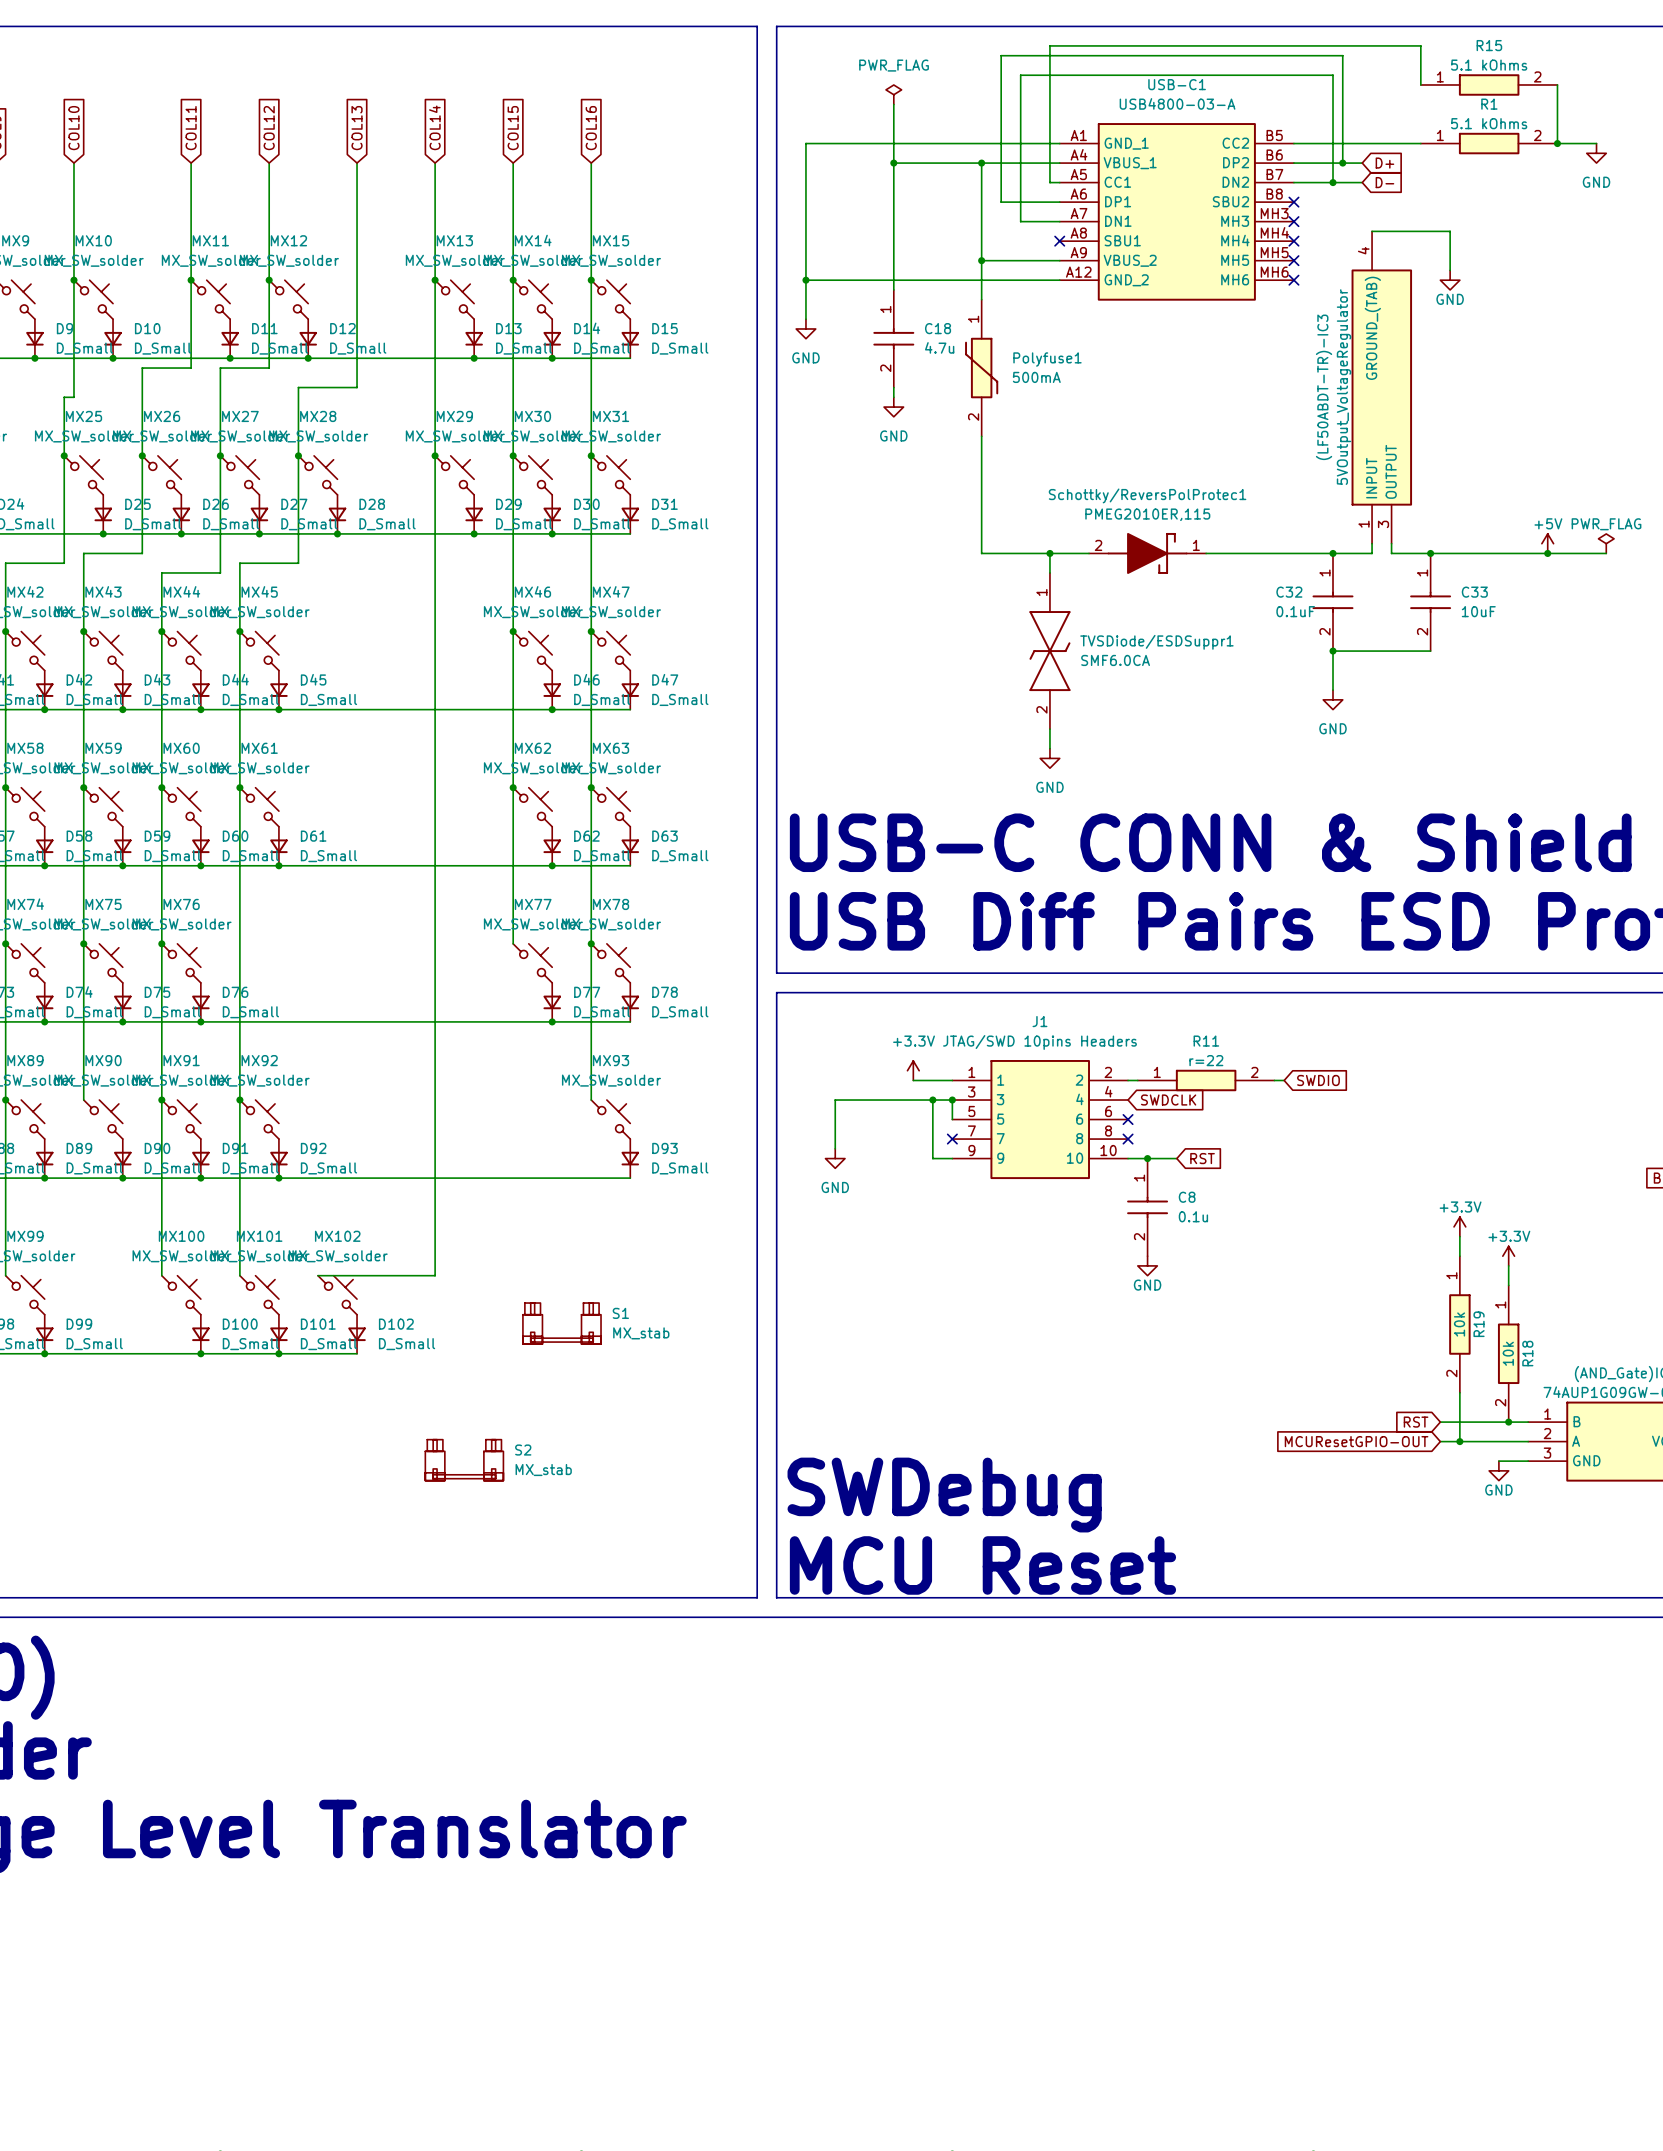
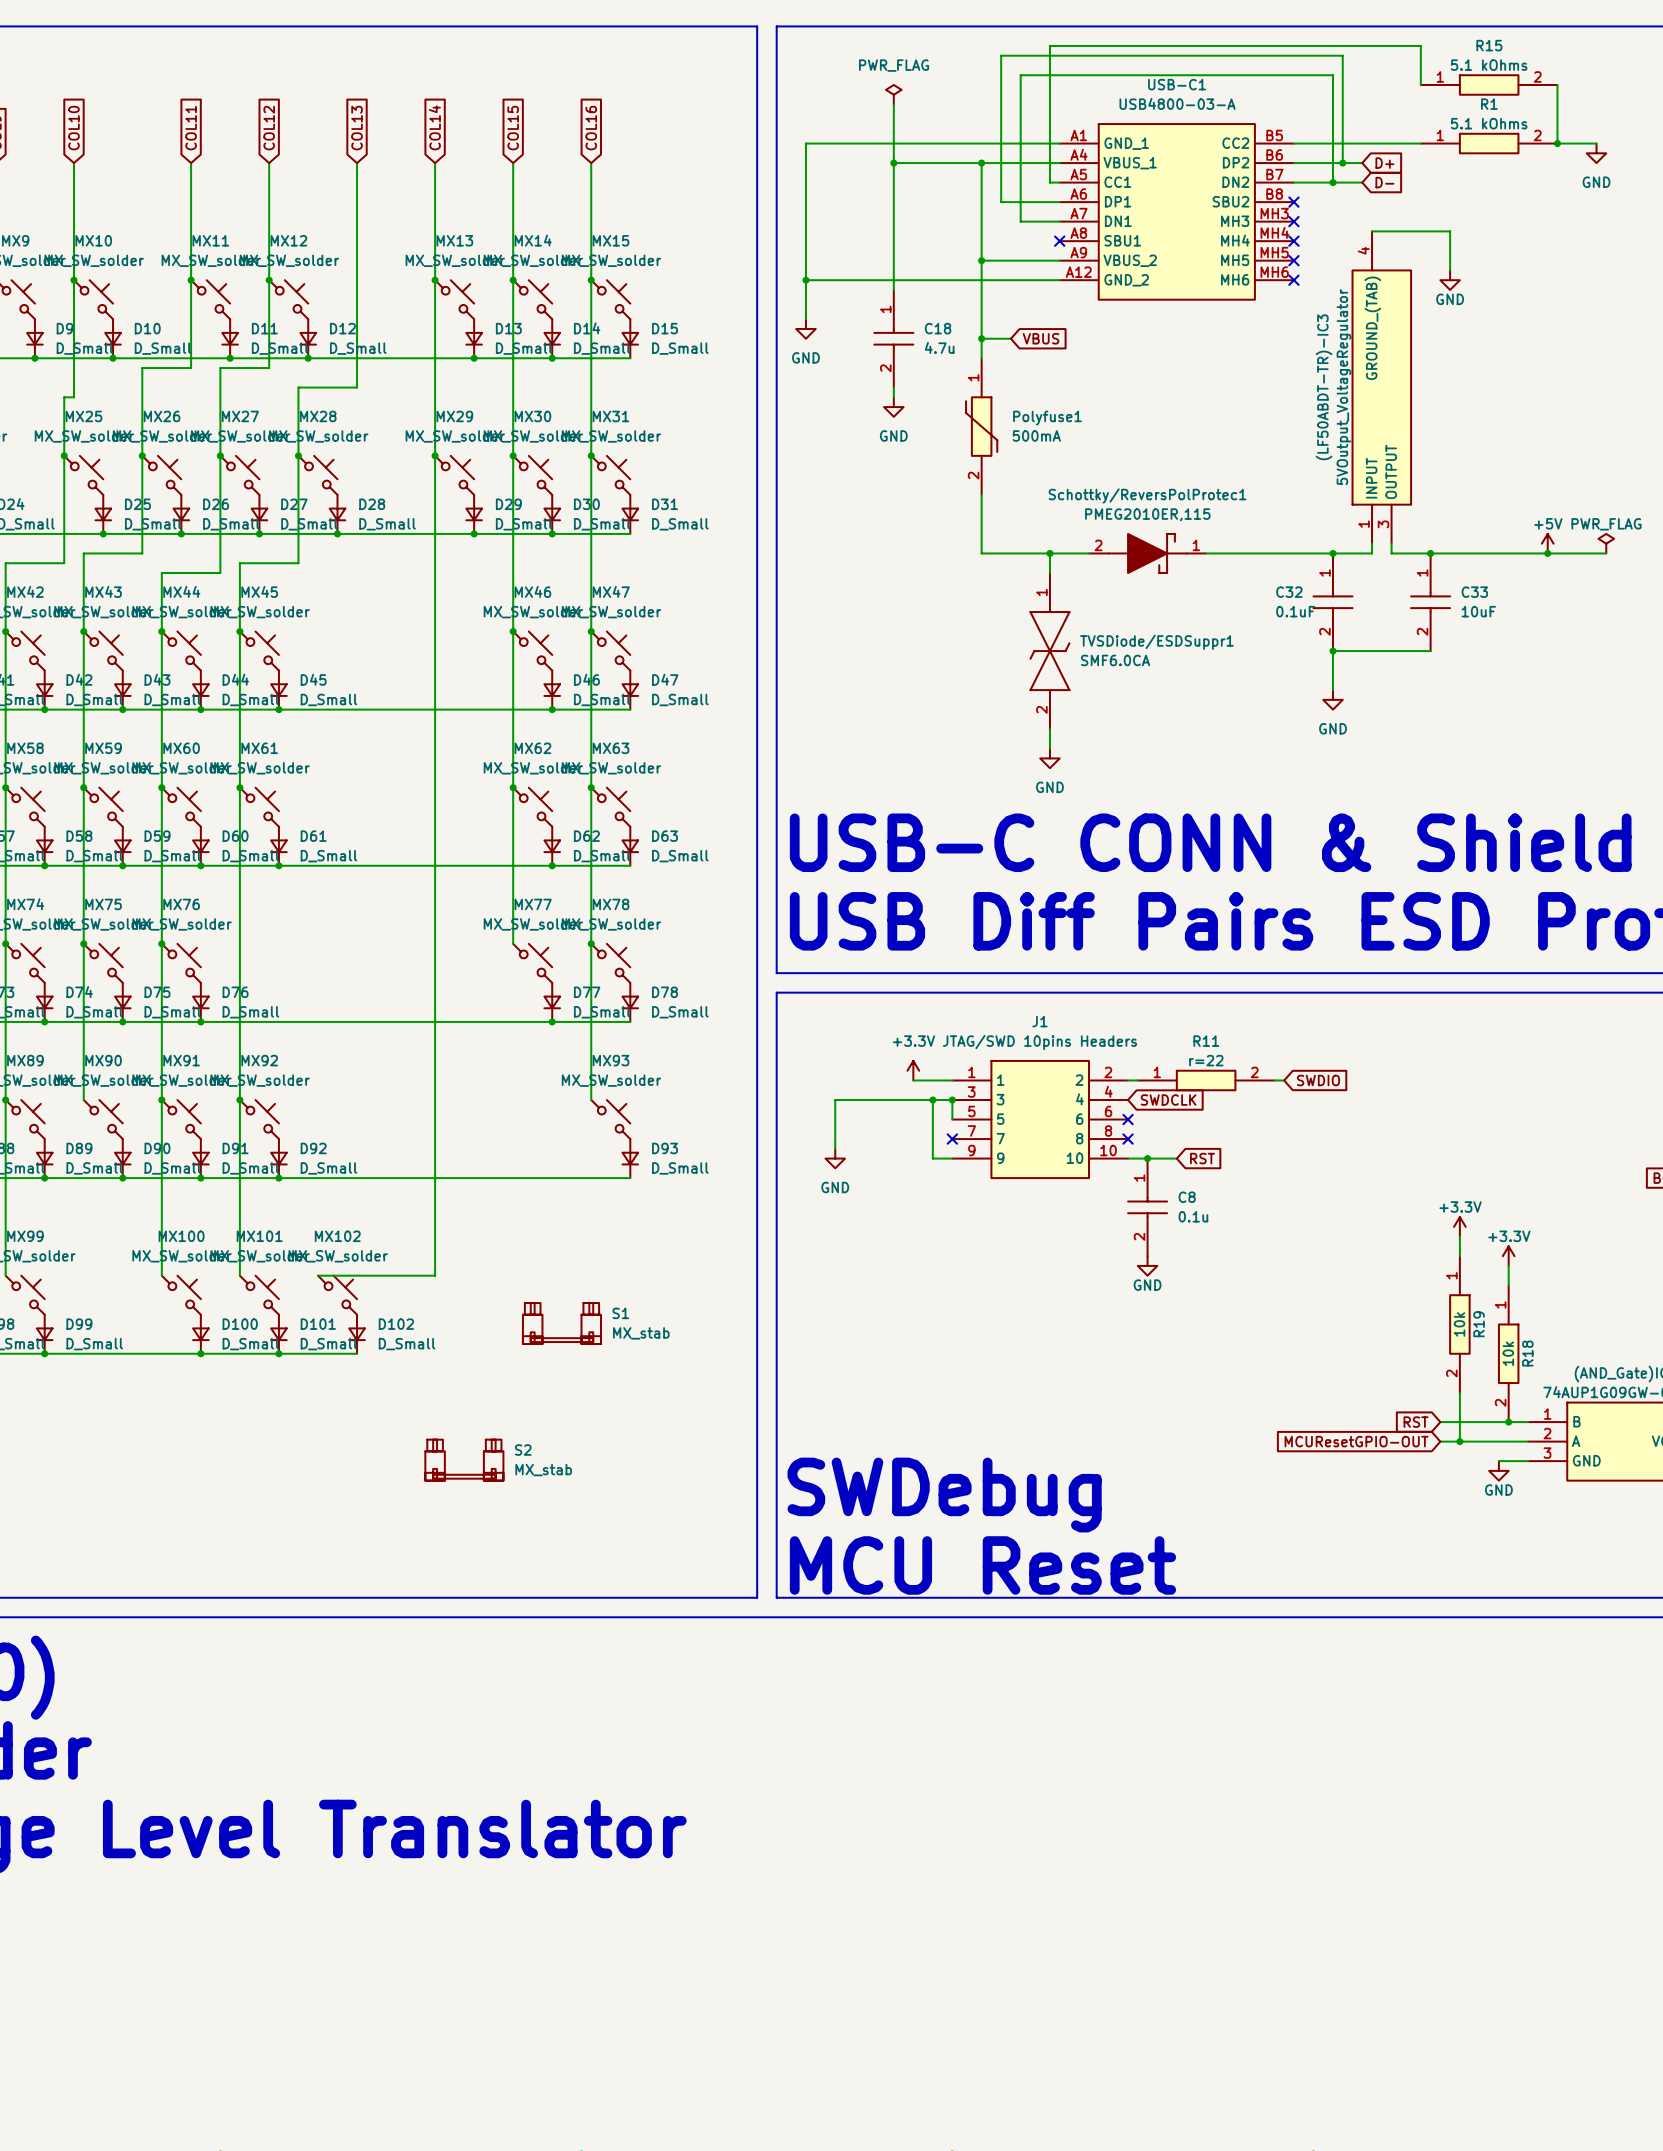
wire: none -> (981, 338) (1010, 338)
junction: none -> (981, 338)
global label: none -> VBUS (1041, 338)
Polyfuse1 position: (981, 368) -> (981, 426)

